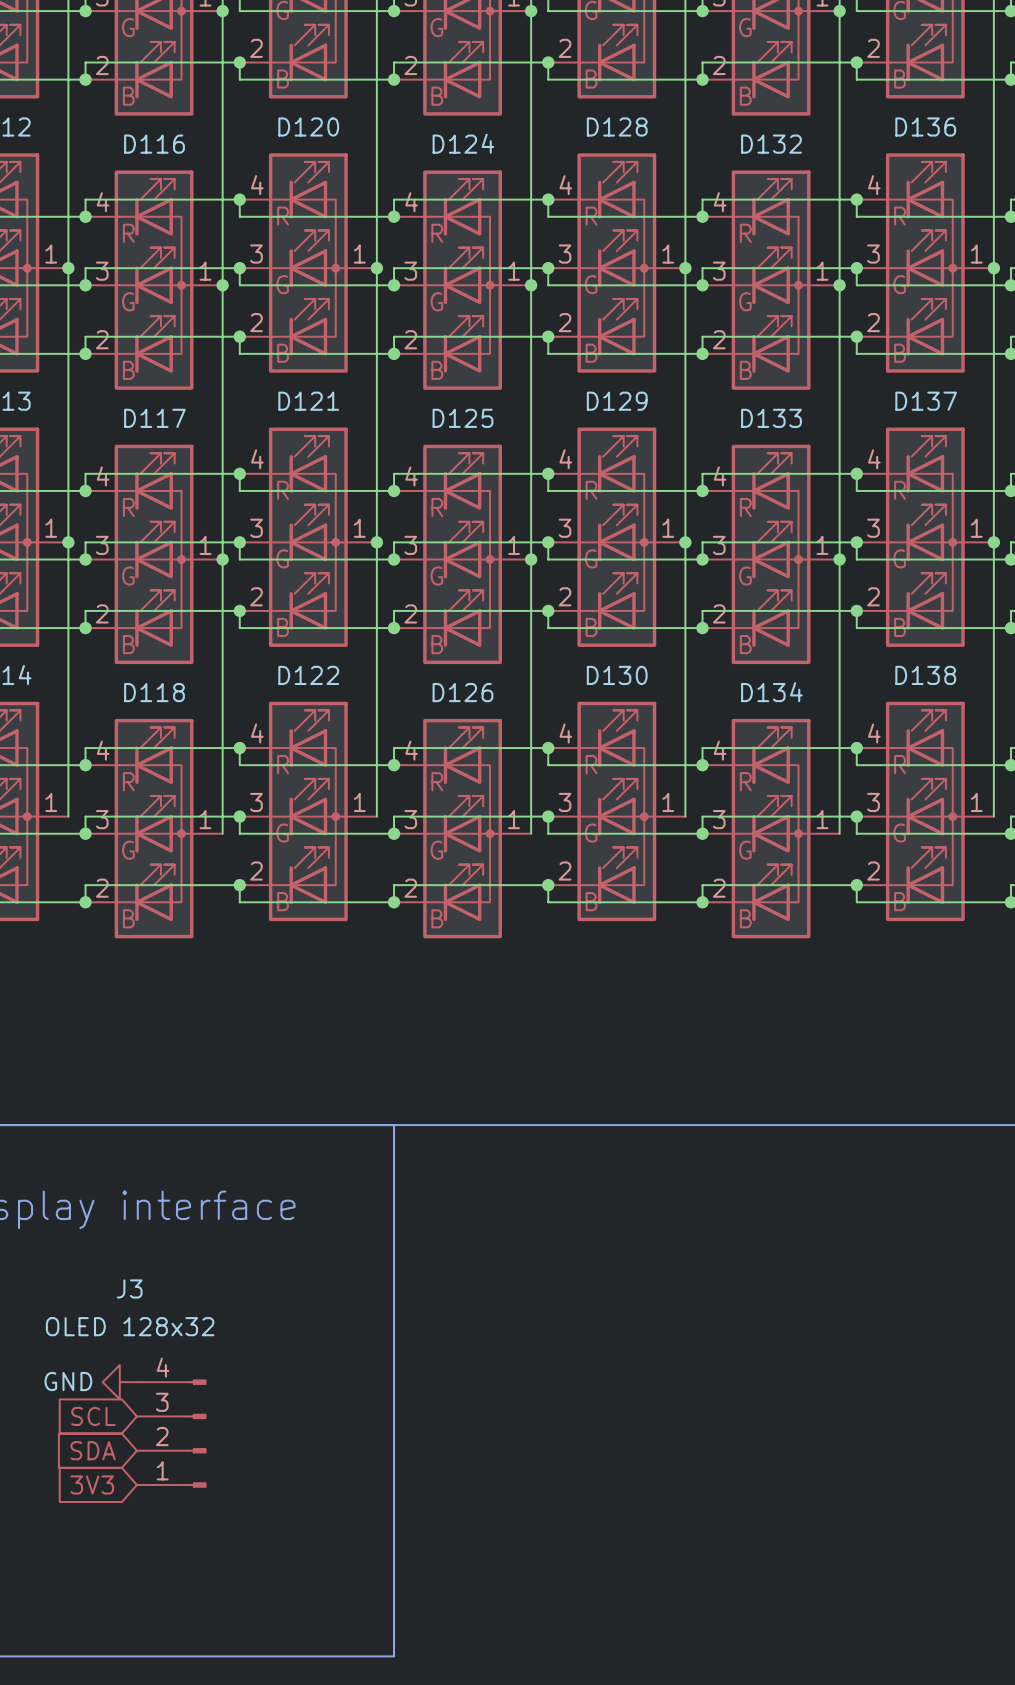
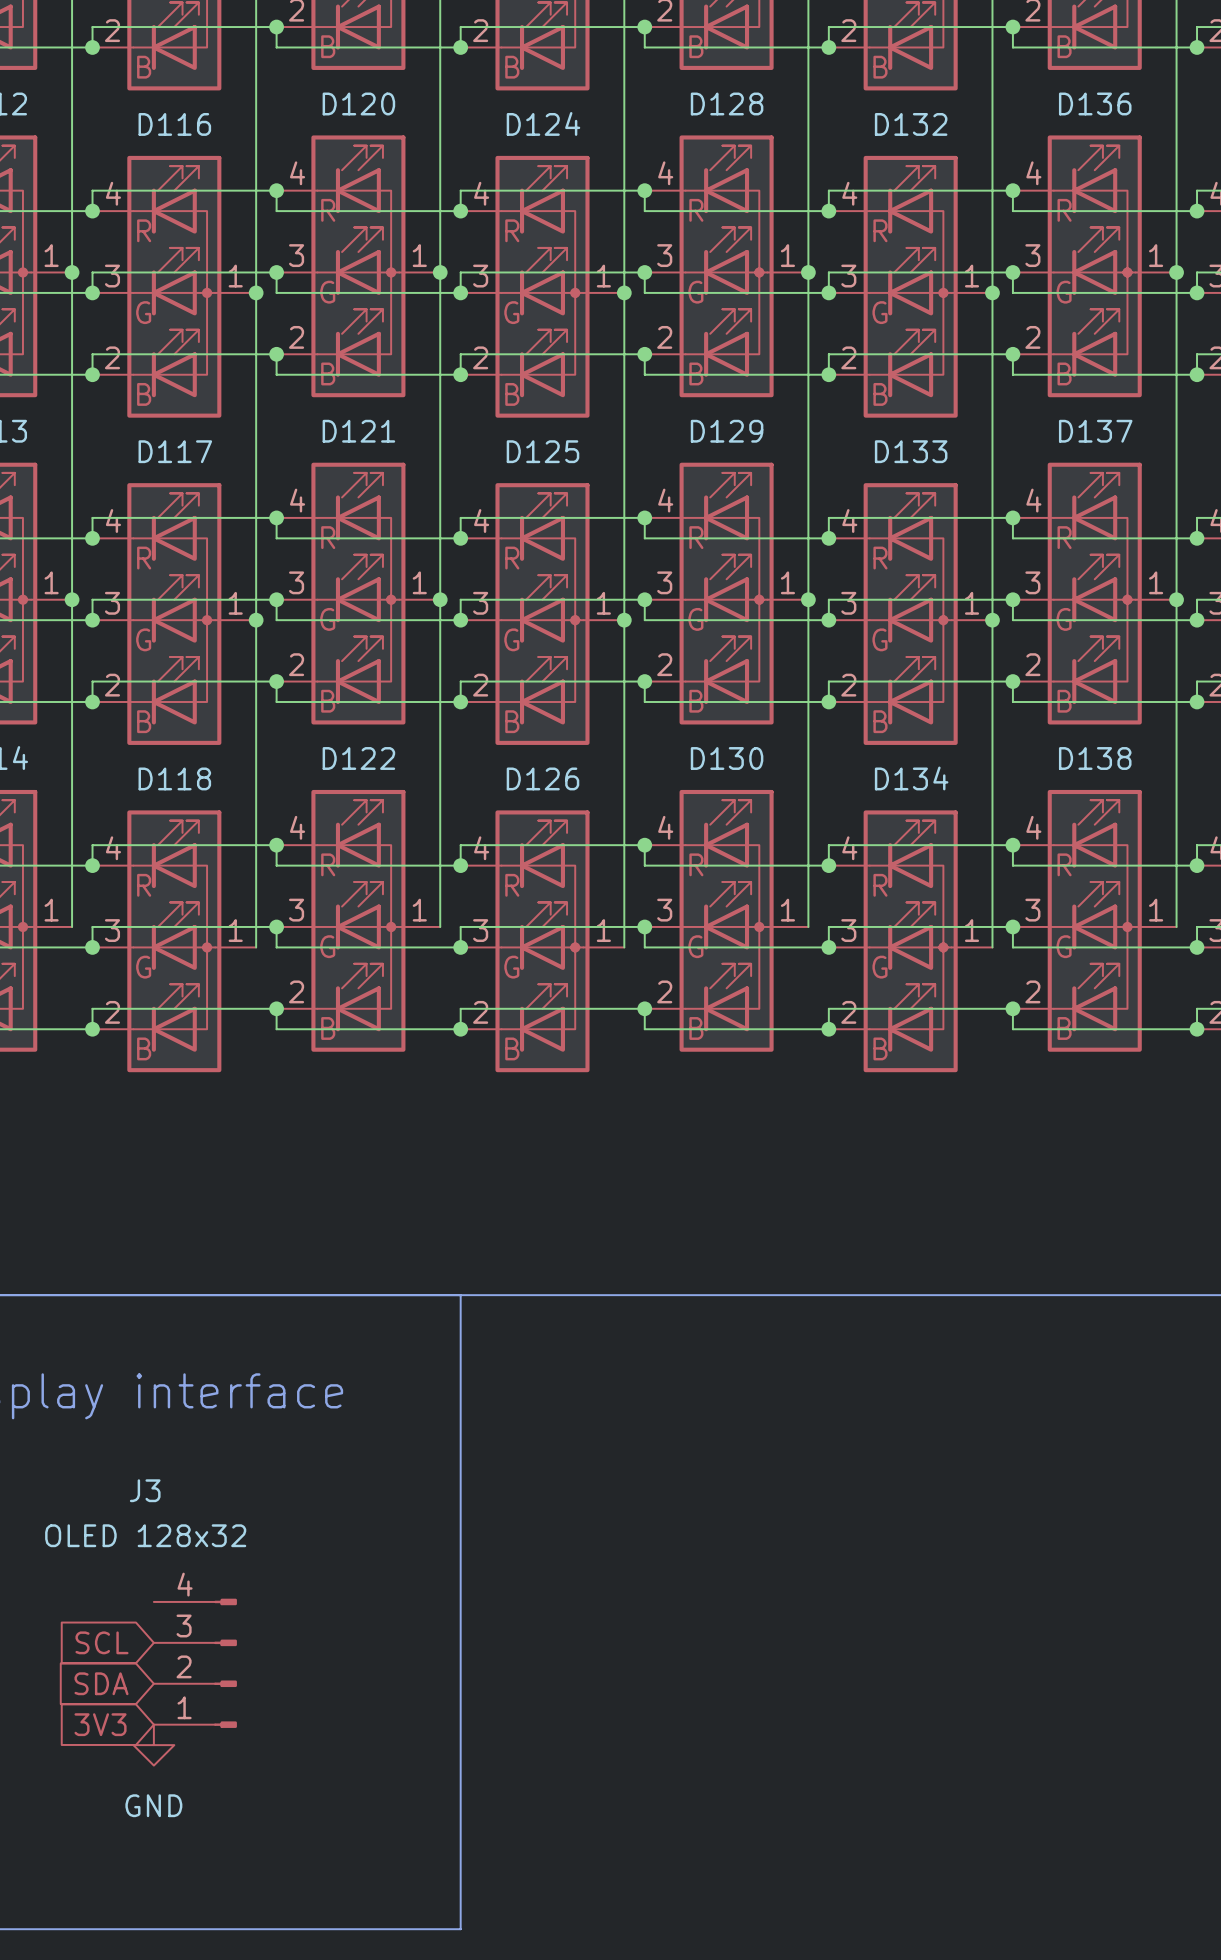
power symbol rotation: 0° (119, 1382) -> 90° counterclockwise (153, 1745)
power symbol position: GND (119, 1382) -> GND (153, 1745)

